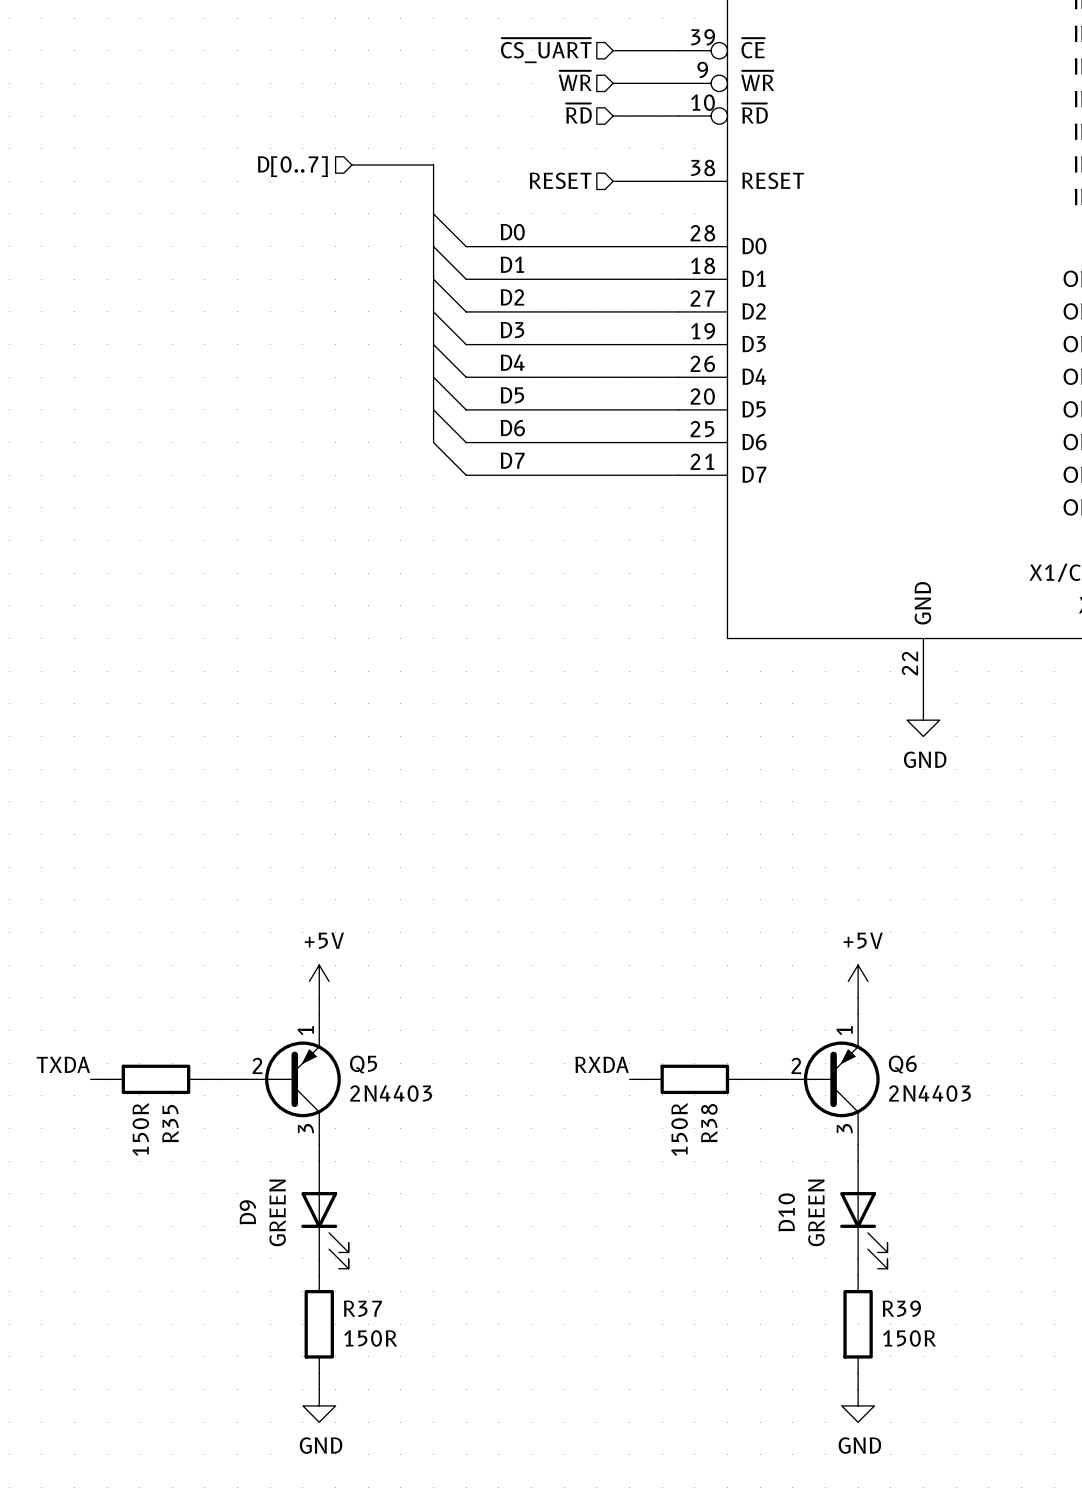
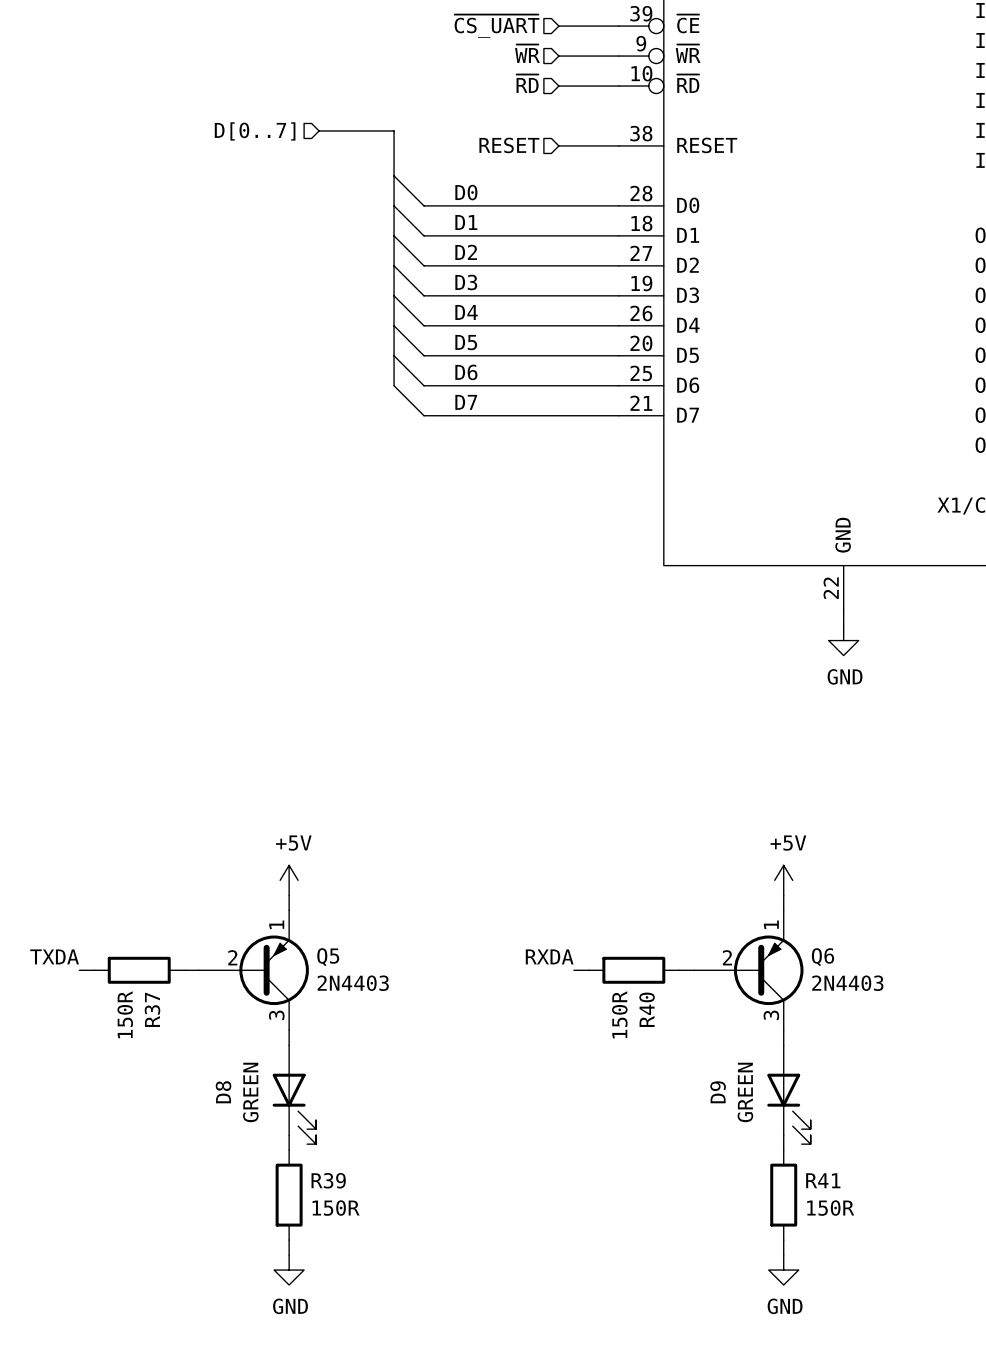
R35 name: R35 (170, 1123) -> R37 (152, 1009)
R38 name: R38 (709, 1123) -> R40 (647, 1009)
D9 name: D9 (247, 1212) -> D8 (223, 1092)
D10 name: D10 (786, 1212) -> D9 (718, 1092)
R37 name: R37 (362, 1308) -> R39 (328, 1180)
R39 name: R39 (901, 1308) -> R41 (823, 1180)

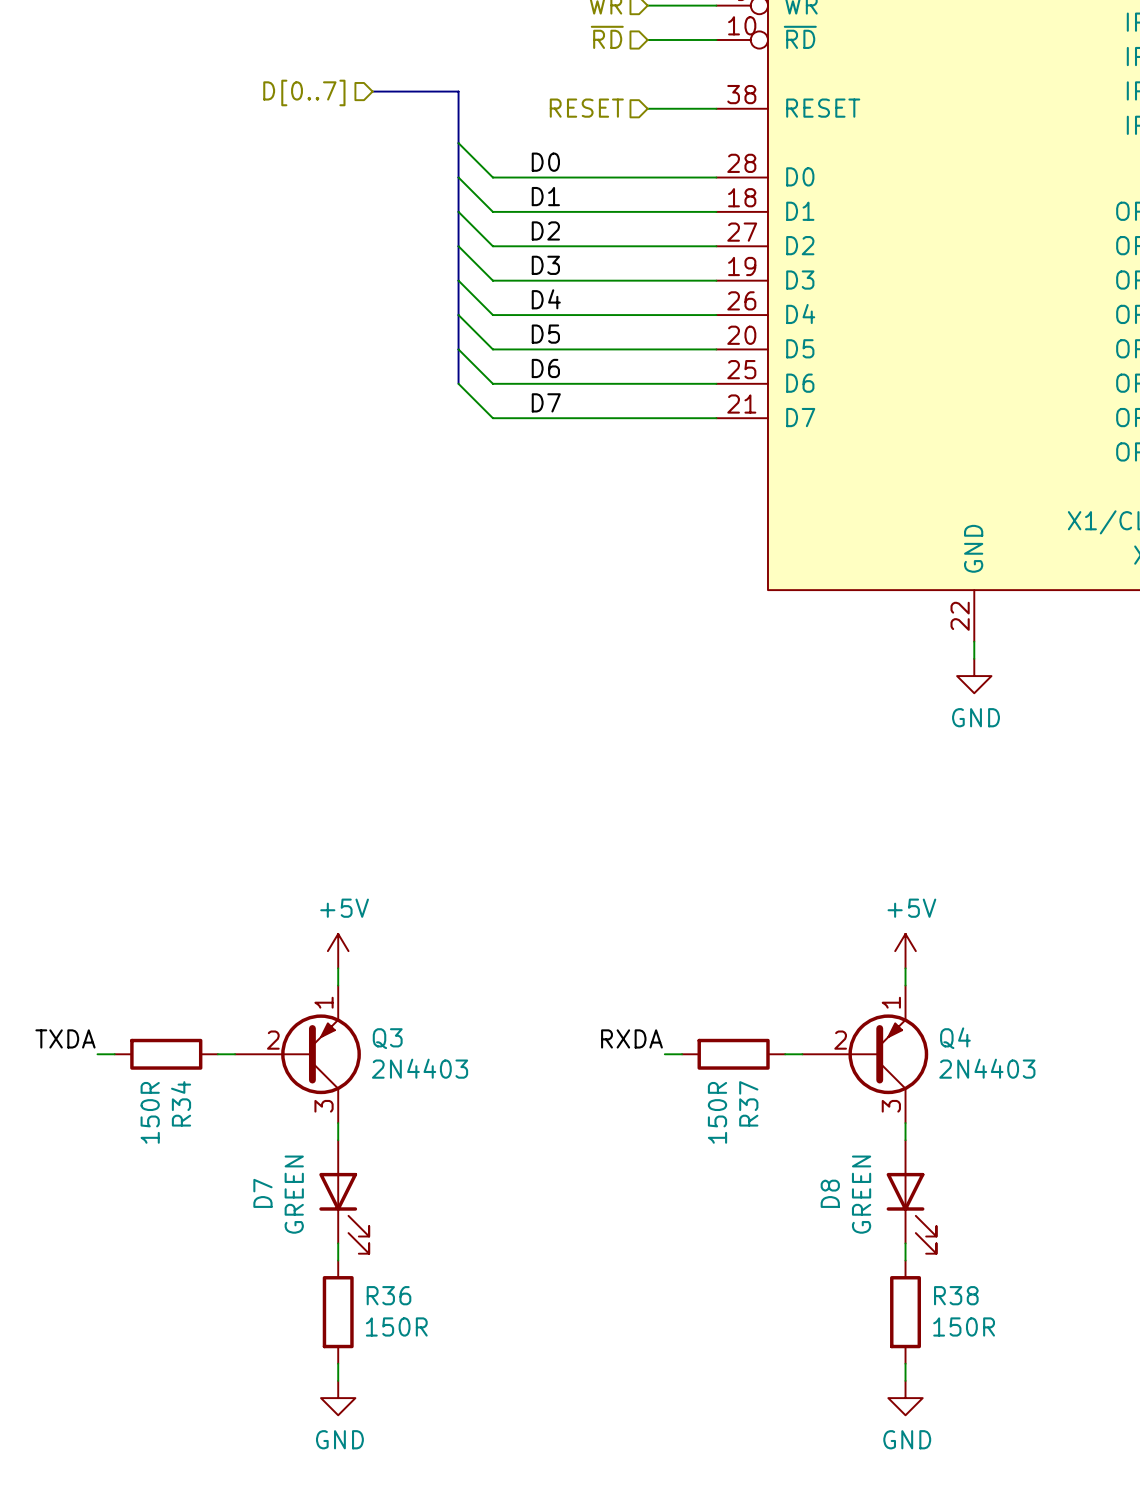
Q5 name: Q5 (328, 957) -> Q3 (387, 1038)
Q6 name: Q6 (822, 957) -> Q4 (955, 1038)
R37 name: R37 (152, 1009) -> R34 (181, 1103)
R40 name: R40 (647, 1009) -> R37 (748, 1103)
D8 name: D8 (223, 1092) -> D7 (262, 1193)
D9 name: D9 (718, 1092) -> D8 (830, 1193)
R39 name: R39 (328, 1180) -> R36 (389, 1295)
R41 name: R41 (823, 1180) -> R38 (956, 1295)

